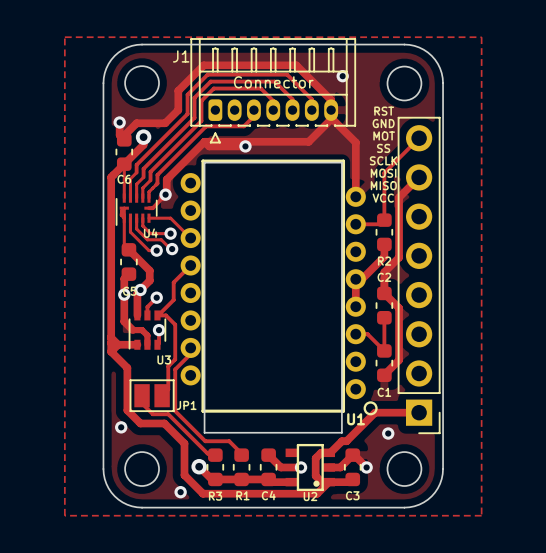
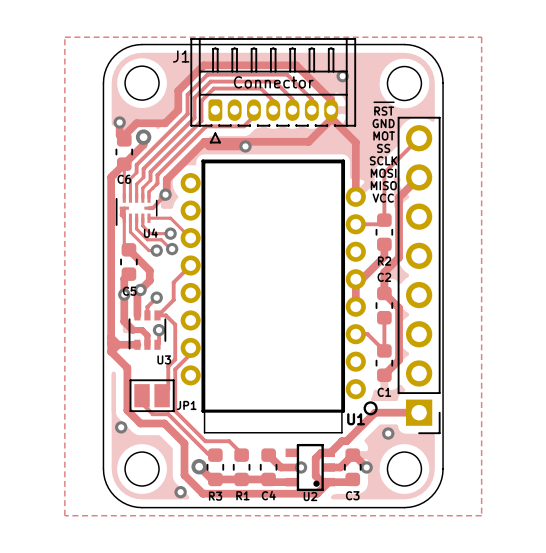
line: none -> (374, 102) (393, 102)

